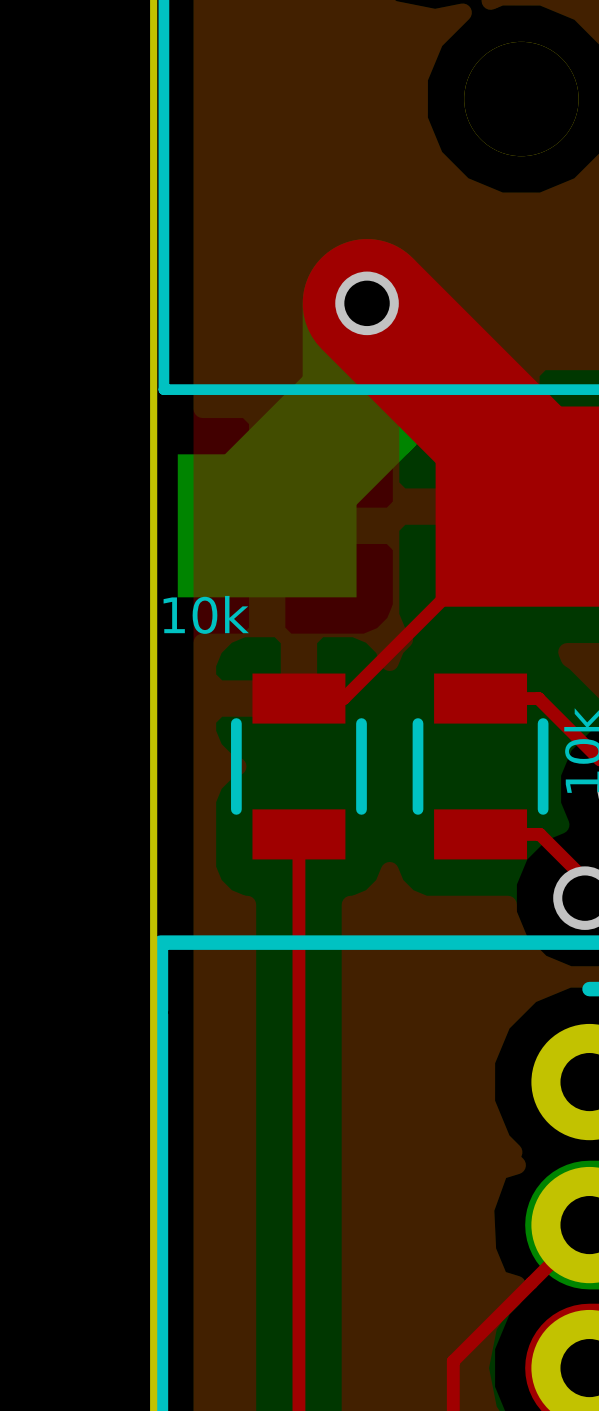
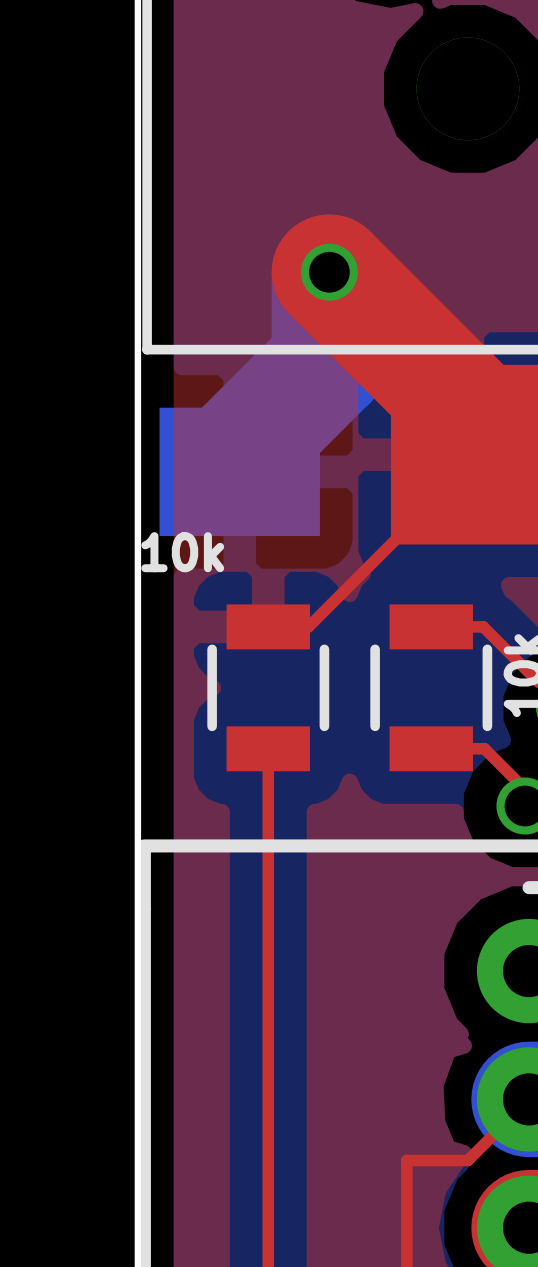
top track: (521, 1293) (453, 1361) -> (467, 1160) (406, 1160) (406, 1221)

